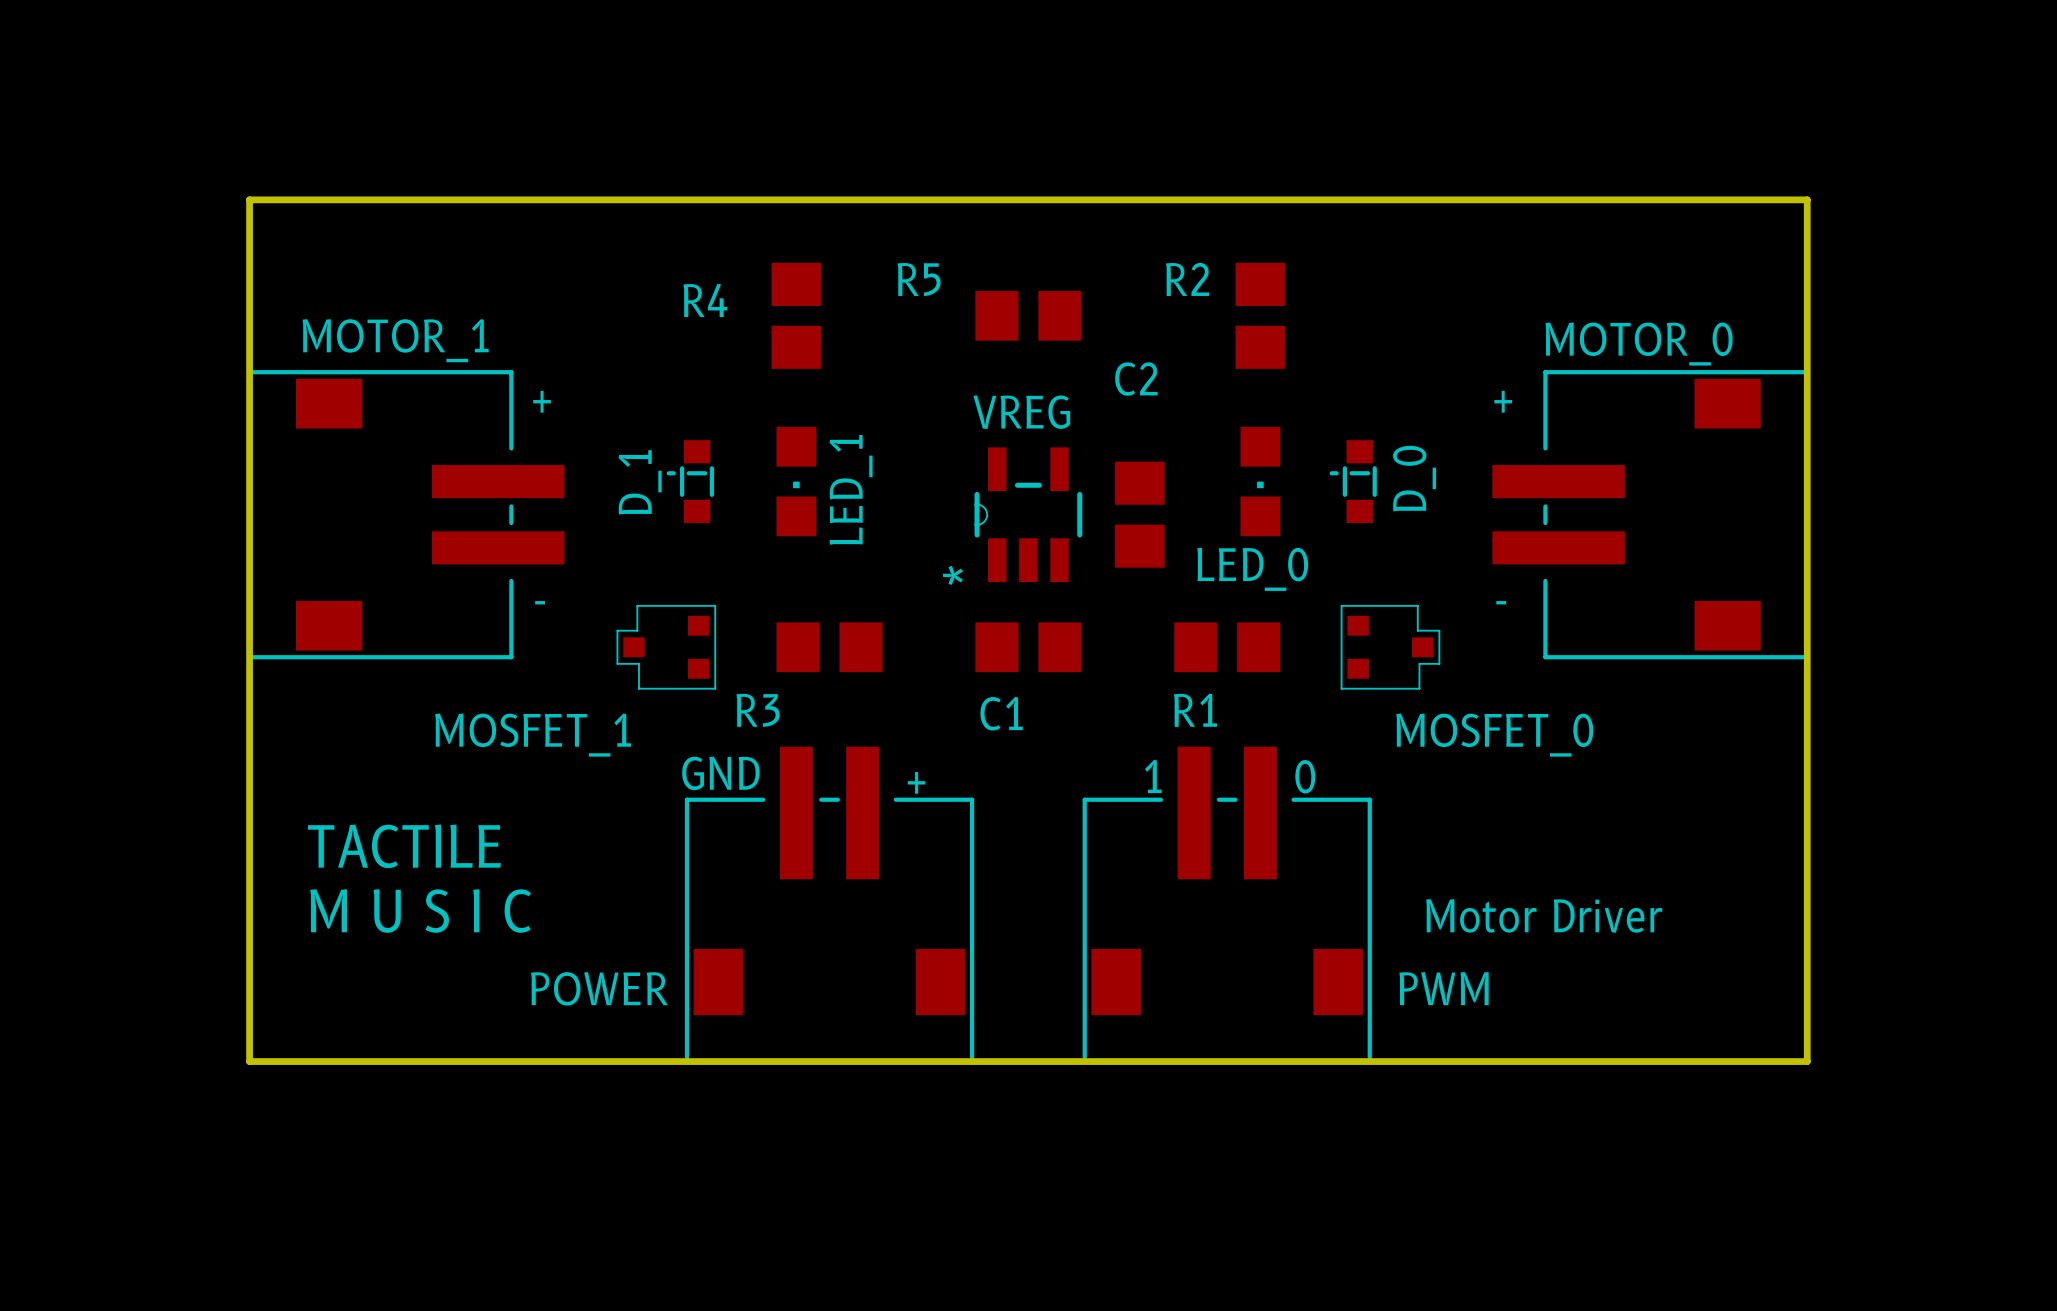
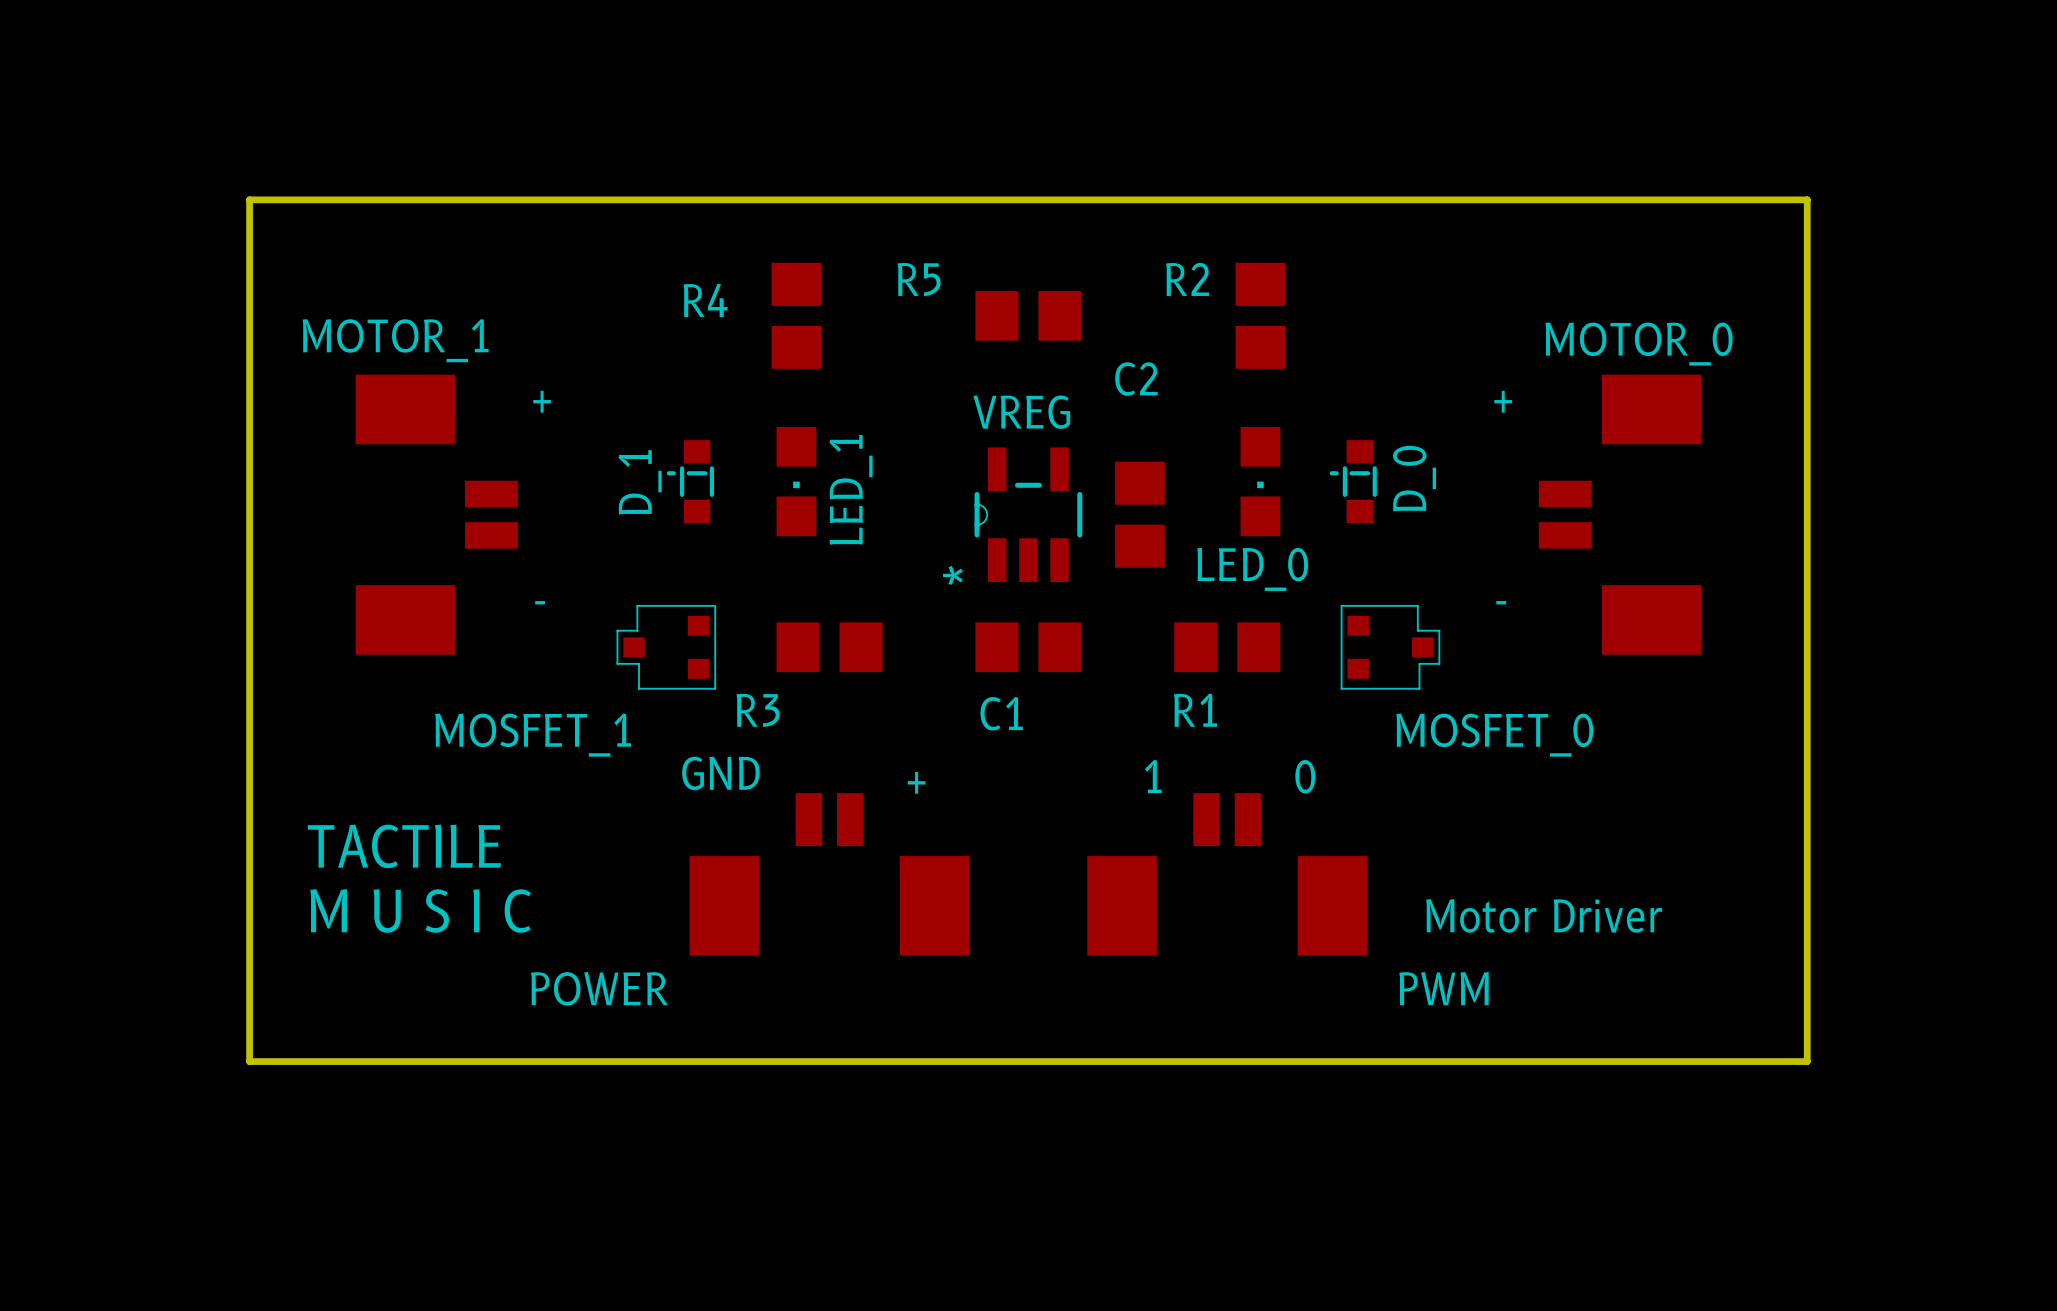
MOTOR_1 footprint: [247, 370, 565, 660] -> [355, 374, 519, 655]
MOTOR_0 footprint: [1492, 370, 1810, 660] -> [1538, 374, 1702, 655]
POWER footprint: [684, 746, 975, 1064] -> [689, 793, 970, 956]
PWM footprint: [1082, 746, 1372, 1064] -> [1087, 793, 1368, 956]

